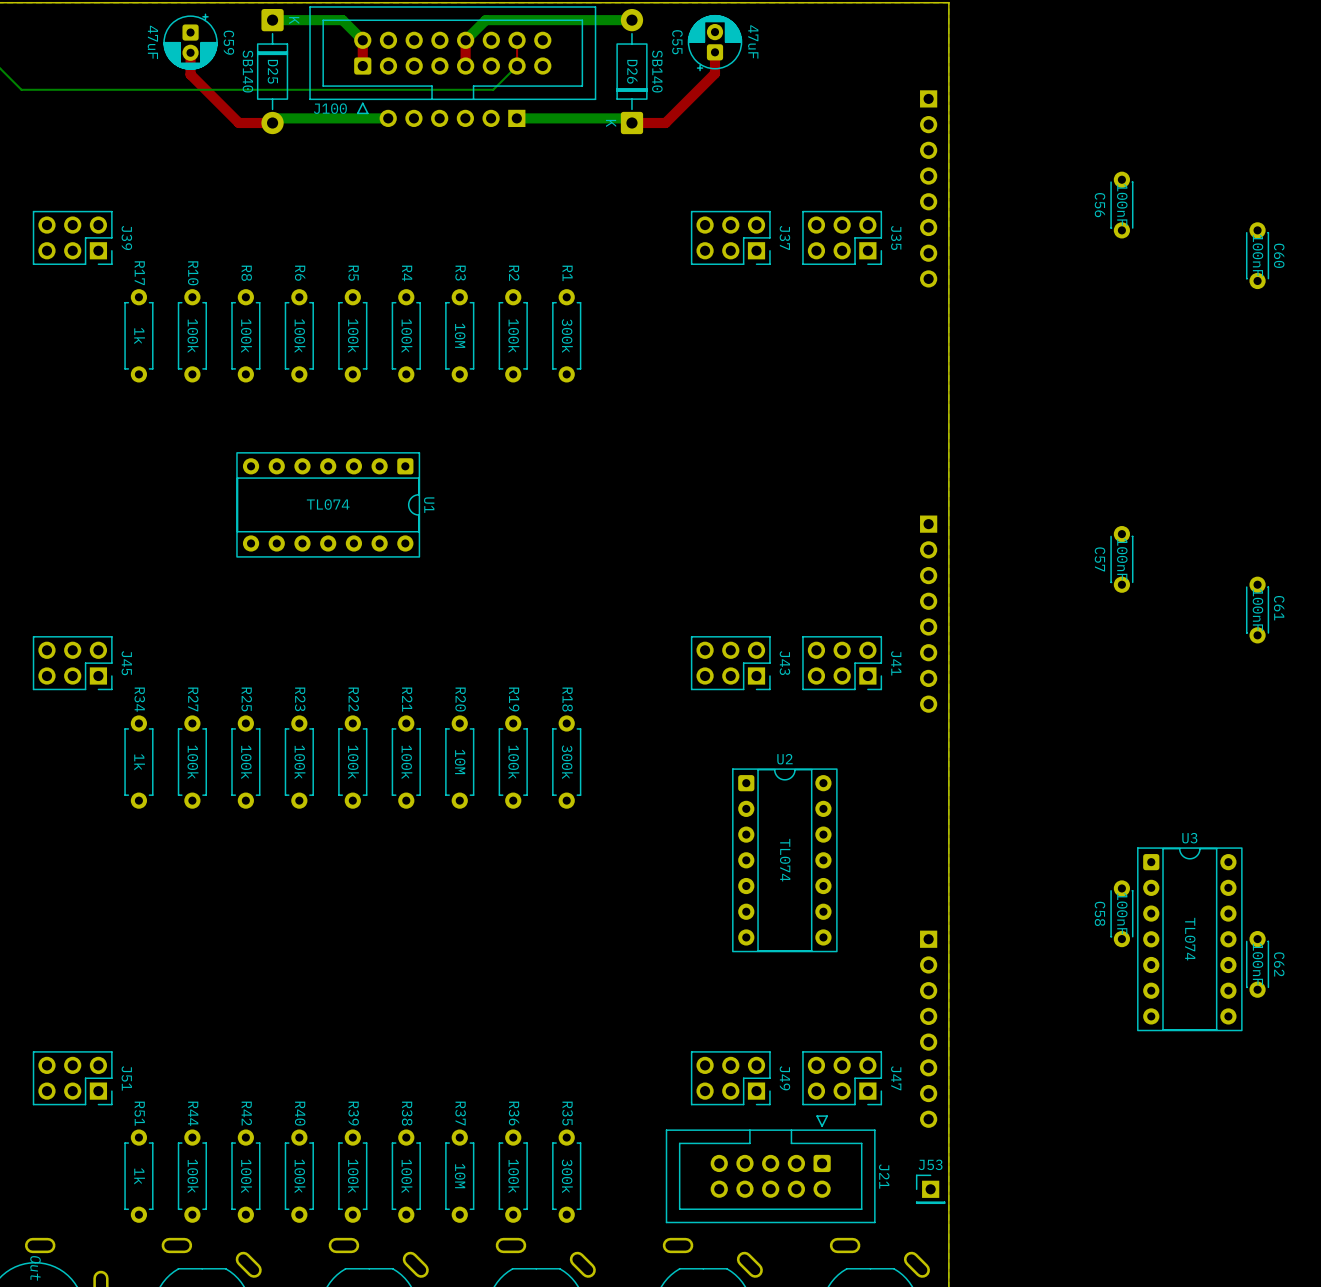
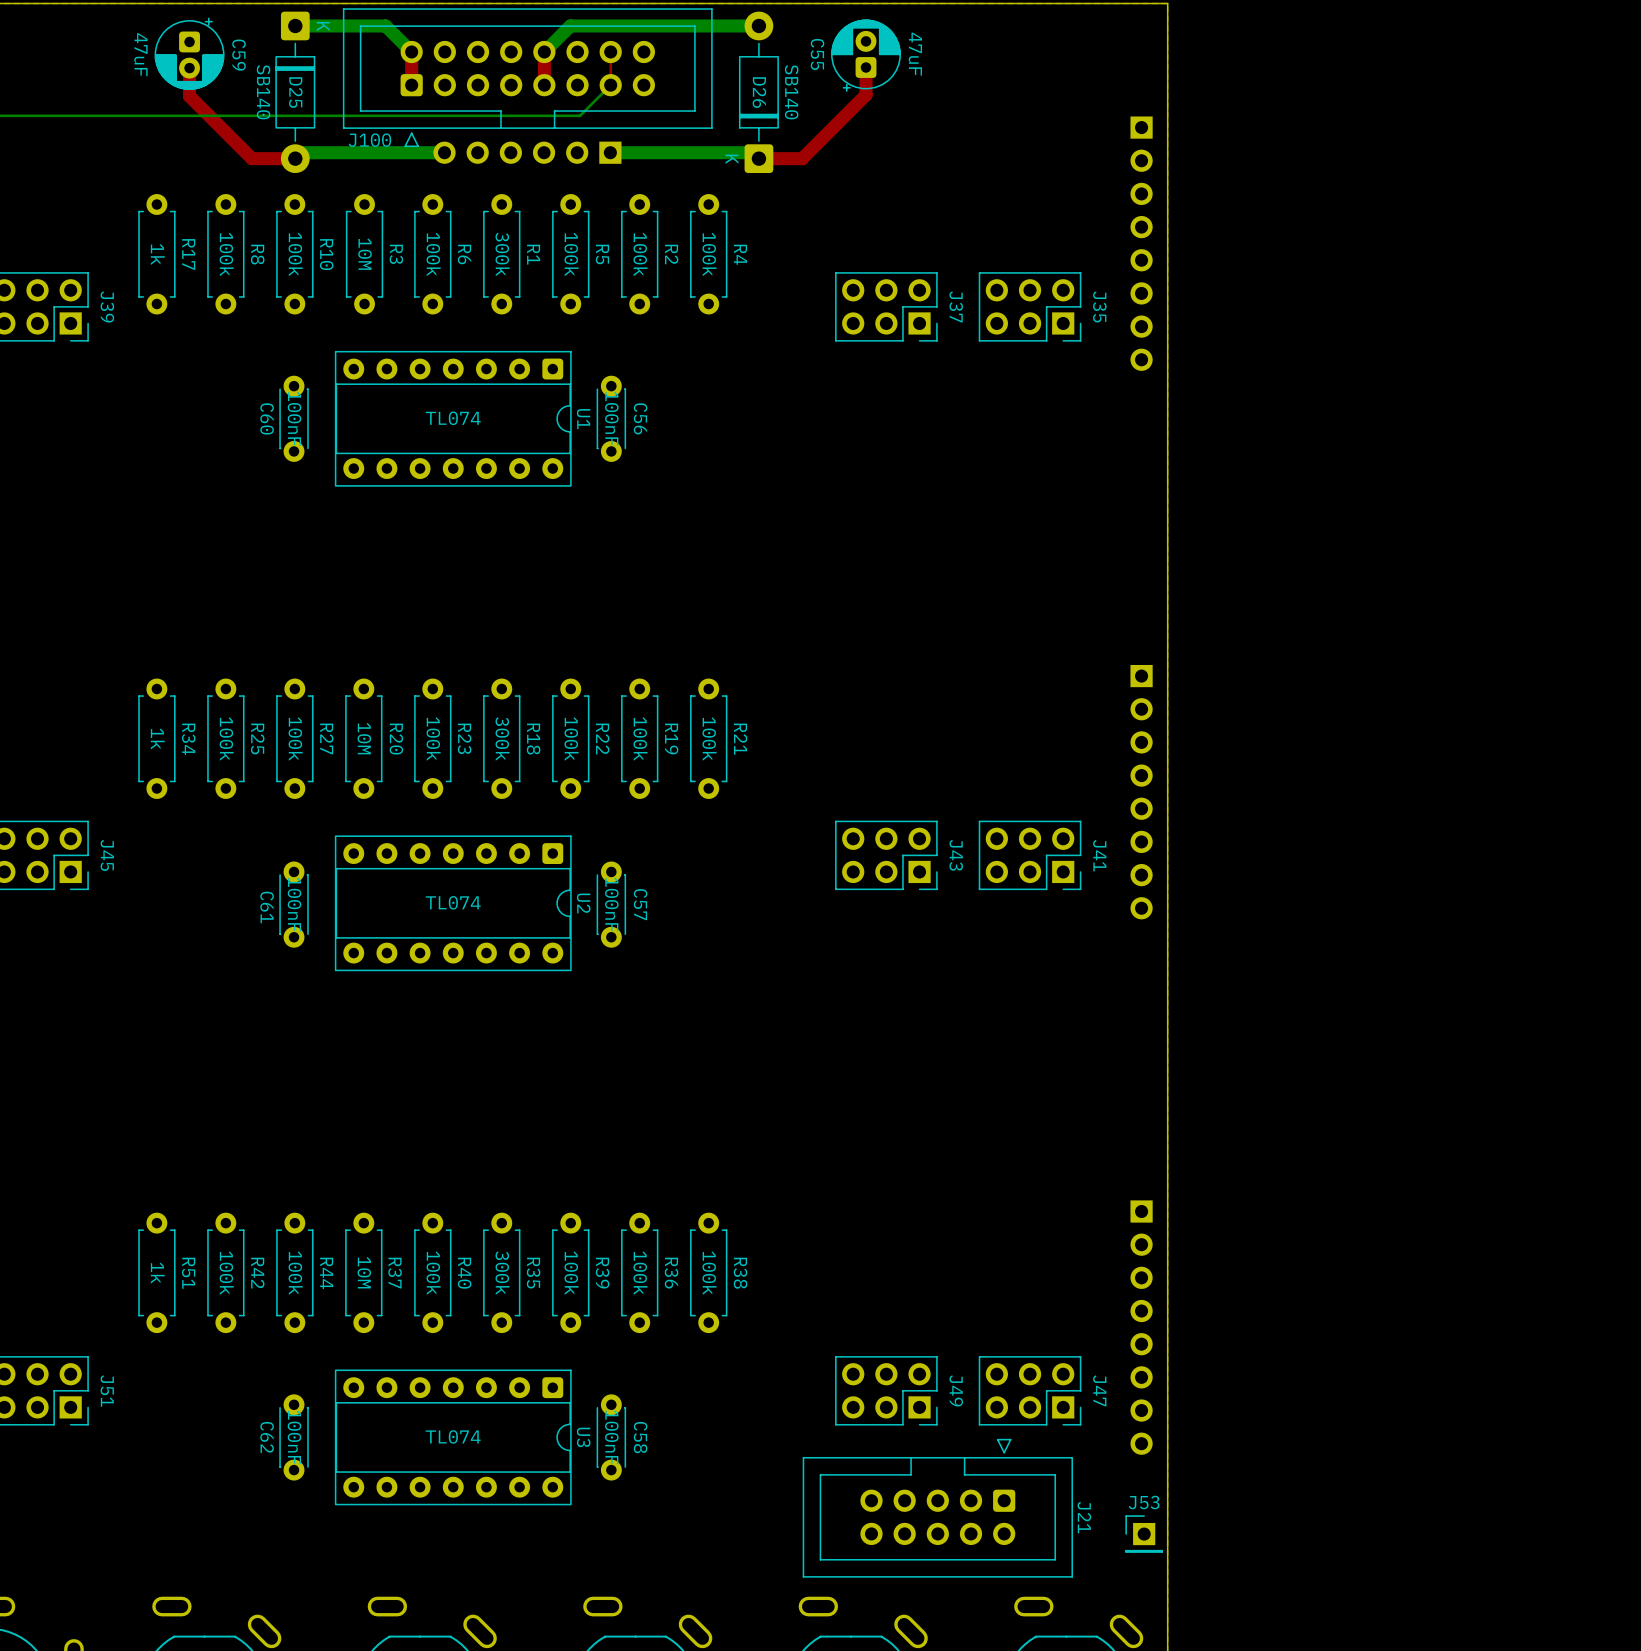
C56 name position: C56 (1100, 205) -> C56 (640, 418)
C56 position: (1121, 205) -> (611, 418)
C60 position: (1257, 255) -> (294, 418)
C60 name position: C60 (1279, 255) -> C60 (267, 418)
R17 name position: R17 (139, 273) -> R17 (188, 254)
R10 name position: R10 (193, 273) -> R10 (326, 254)
R8 name position: R8 (246, 273) -> R8 (257, 254)
R6 name position: R6 (300, 273) -> R6 (464, 254)
R5 name position: R5 (353, 273) -> R5 (602, 254)
R4 name position: R4 (407, 273) -> R4 (740, 254)
R3 name position: R3 (460, 273) -> R3 (396, 254)
R2 name position: R2 (514, 273) -> R2 (671, 254)
R1 name position: R1 (567, 273) -> R1 (533, 254)
R17 position: (138, 335) -> (156, 254)
R10 position: (192, 335) -> (294, 254)
R8 position: (245, 335) -> (225, 254)
R6 position: (299, 335) -> (432, 254)
R5 position: (352, 335) -> (570, 254)
R4 position: (406, 335) -> (708, 254)
R3 position: (459, 335) -> (364, 254)
R2 position: (513, 335) -> (639, 254)
R1 position: (566, 335) -> (501, 254)
U1 position: (328, 504) -> (453, 418)
C57 name position: C57 (1100, 559) -> C57 (640, 904)
C57 position: (1121, 559) -> (611, 904)
C61 name position: C61 (1279, 608) -> C61 (267, 907)
C61 position: (1257, 610) -> (294, 904)
R34 name position: R34 (139, 699) -> R34 (188, 739)
R27 name position: R27 (193, 699) -> R27 (326, 738)
R25 name position: R25 (246, 699) -> R25 (257, 738)
R23 name position: R23 (300, 699) -> R23 (464, 738)
R22 name position: R22 (353, 699) -> R22 (602, 739)
R21 name position: R21 (407, 699) -> R21 (740, 739)
R20 name position: R20 (460, 699) -> R20 (396, 739)
R19 name position: R19 (514, 699) -> R19 (671, 739)
R18 name position: R18 (567, 699) -> R18 (533, 739)
R34 position: (138, 762) -> (156, 738)
R27 position: (192, 762) -> (294, 738)
R25 position: (245, 762) -> (225, 738)
R23 position: (299, 762) -> (432, 738)
R22 position: (352, 762) -> (570, 738)
R21 position: (406, 762) -> (708, 738)
R20 position: (459, 762) -> (363, 738)
R19 position: (513, 762) -> (639, 738)
R18 position: (566, 762) -> (501, 738)
U2 rotation: 0° (784, 860) -> 90° clockwise (453, 903)
U2 position: (784, 860) -> (453, 903)
C58 name position: C58 (1100, 913) -> C58 (640, 1437)
C58 position: (1121, 913) -> (611, 1437)
U3 rotation: 0° (1189, 939) -> 90° clockwise (453, 1437)
U3 position: (1189, 939) -> (453, 1437)
C62 position: (1257, 964) -> (294, 1437)
C62 name position: C62 (1279, 964) -> C62 (267, 1437)
R51 name position: R51 (139, 1113) -> R51 (188, 1273)
R44 name position: R44 (193, 1113) -> R44 (326, 1273)
R42 name position: R42 (246, 1113) -> R42 (257, 1273)
R40 name position: R40 (300, 1113) -> R40 (464, 1273)
R39 name position: R39 (353, 1113) -> R39 (602, 1273)
R38 name position: R38 (407, 1113) -> R38 (740, 1273)
R37 name position: R37 (460, 1113) -> R37 (395, 1273)
R36 name position: R36 (514, 1113) -> R36 (671, 1273)
R35 name position: R35 (567, 1113) -> R35 (533, 1273)
R51 position: (138, 1176) -> (156, 1272)
R44 position: (192, 1176) -> (294, 1272)
R42 position: (245, 1176) -> (225, 1272)
R40 position: (299, 1176) -> (432, 1272)
R39 position: (352, 1176) -> (570, 1272)
R38 position: (406, 1176) -> (708, 1272)
R37 position: (459, 1176) -> (363, 1272)
R36 position: (513, 1176) -> (639, 1272)
R35 position: (566, 1176) -> (501, 1272)

